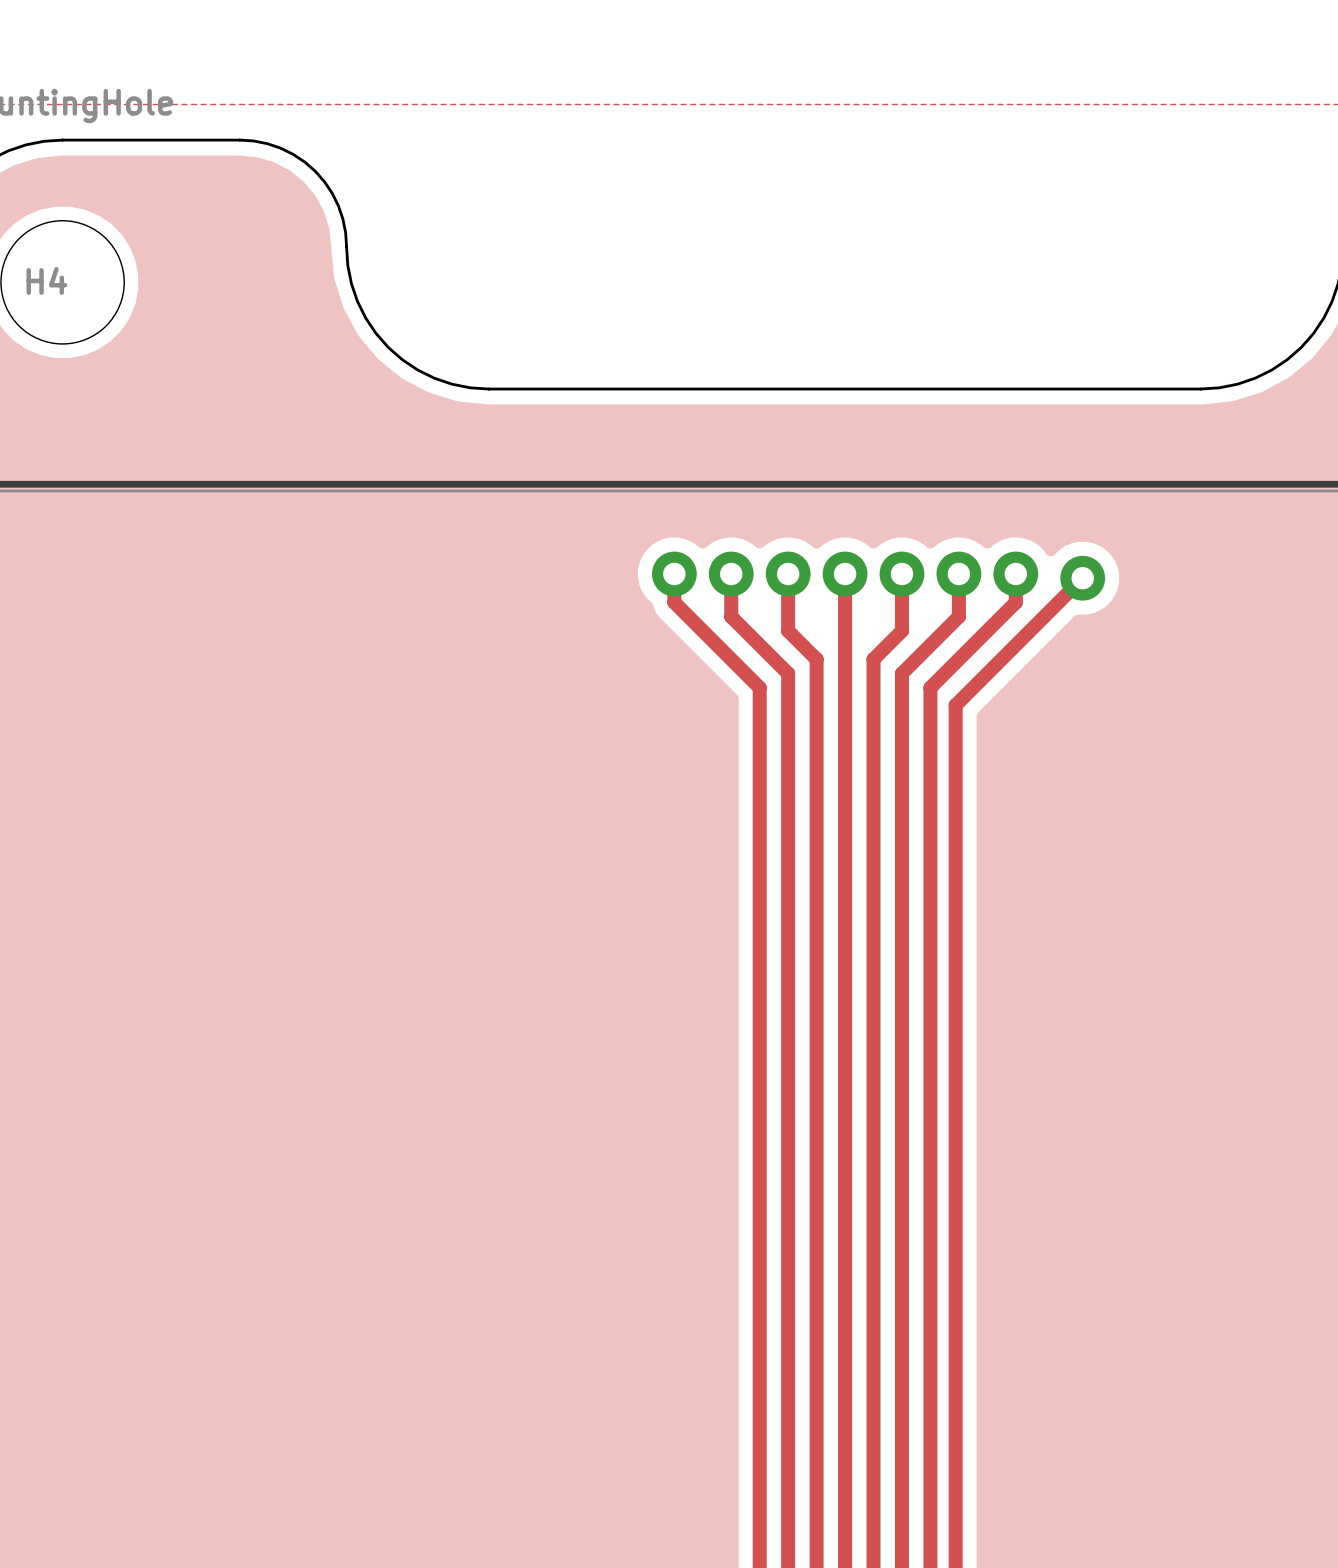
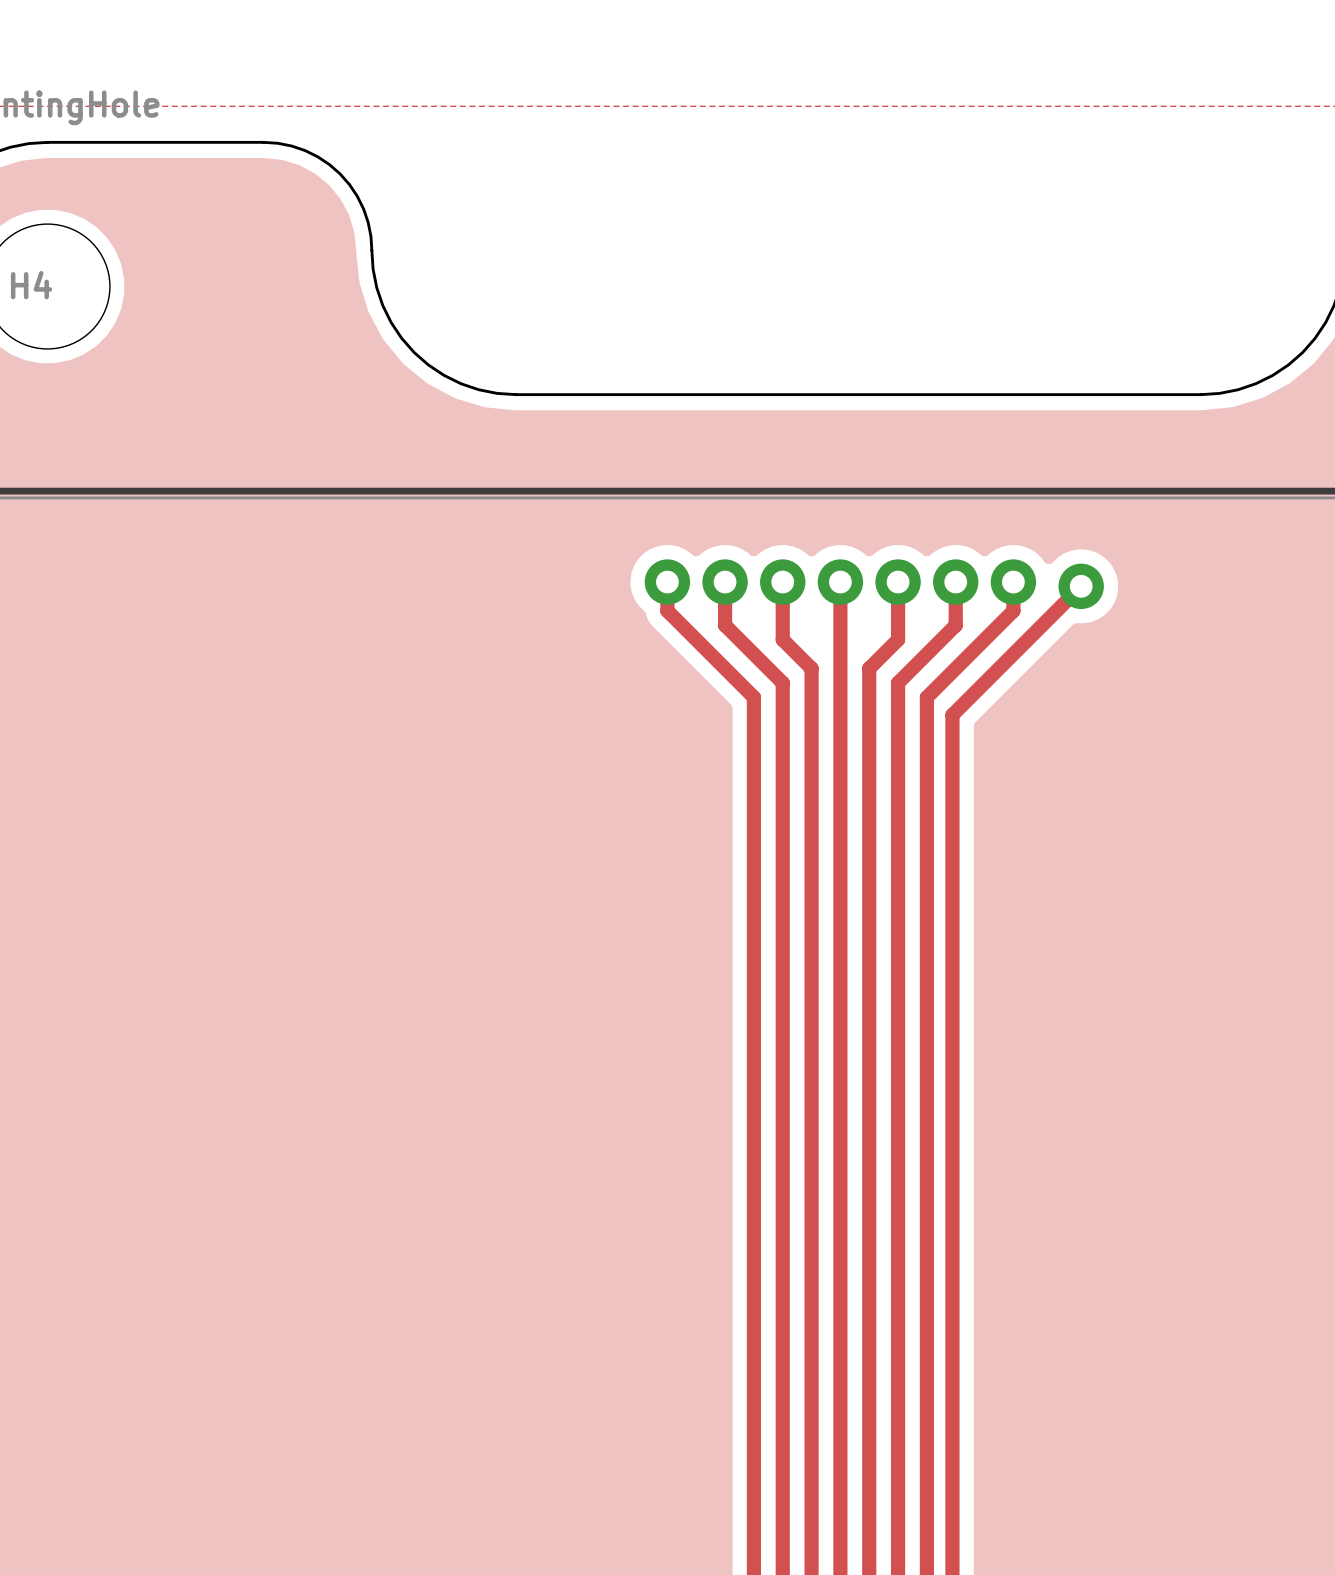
board edge: (239, 140) (267, 143) (293, 154) (304, 162) (324, 181) (332, 193) (342, 219) (347, 265) (357, 301) (375, 333) (402, 359) (417, 369) (452, 384) (470, 387) (524, 389) -> (227, 142) (263, 142) (291, 146) (317, 156) (329, 164) (349, 184) (363, 209) (370, 236) (373, 269) (376, 287) (391, 322) (401, 338) (414, 352) (443, 375) (478, 389) (516, 394)

